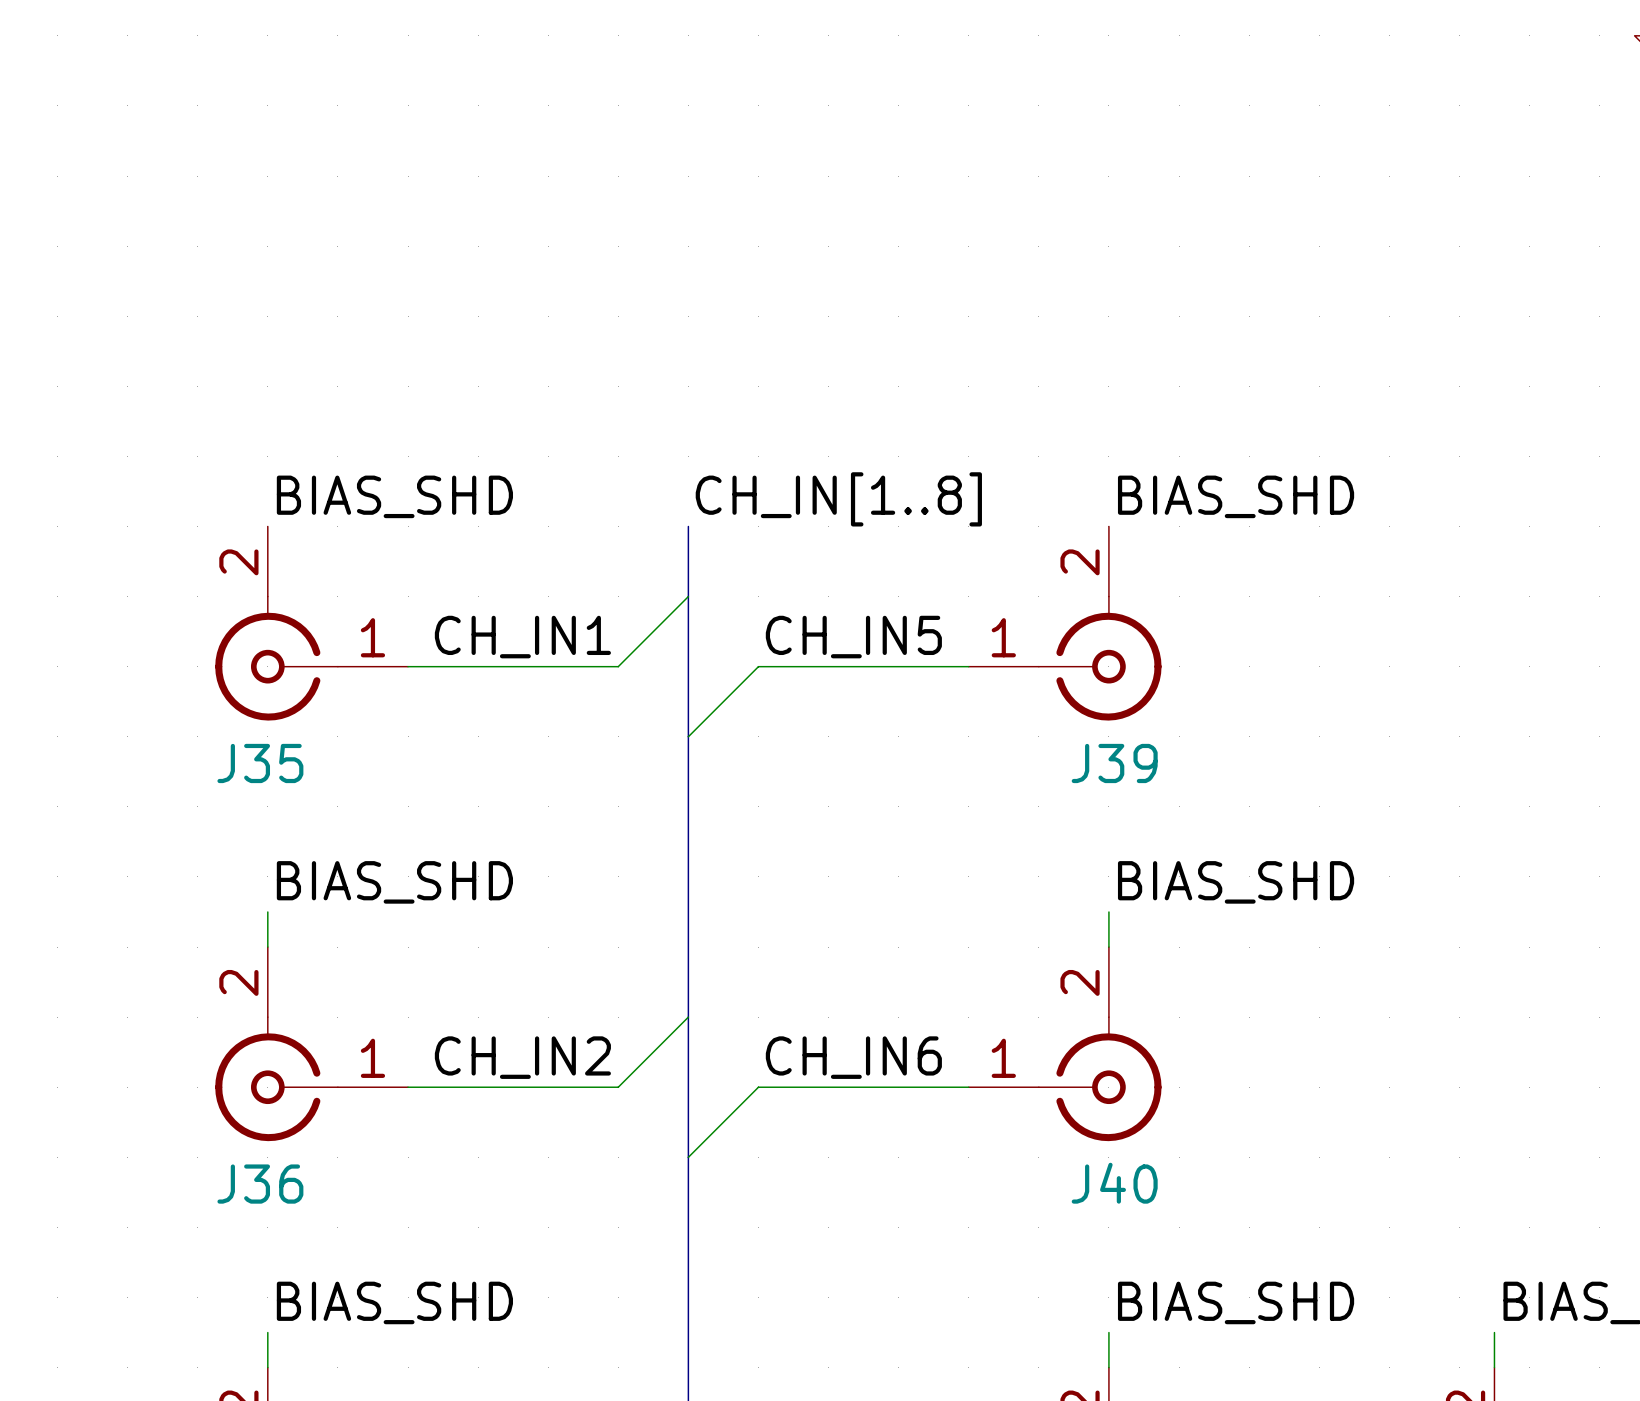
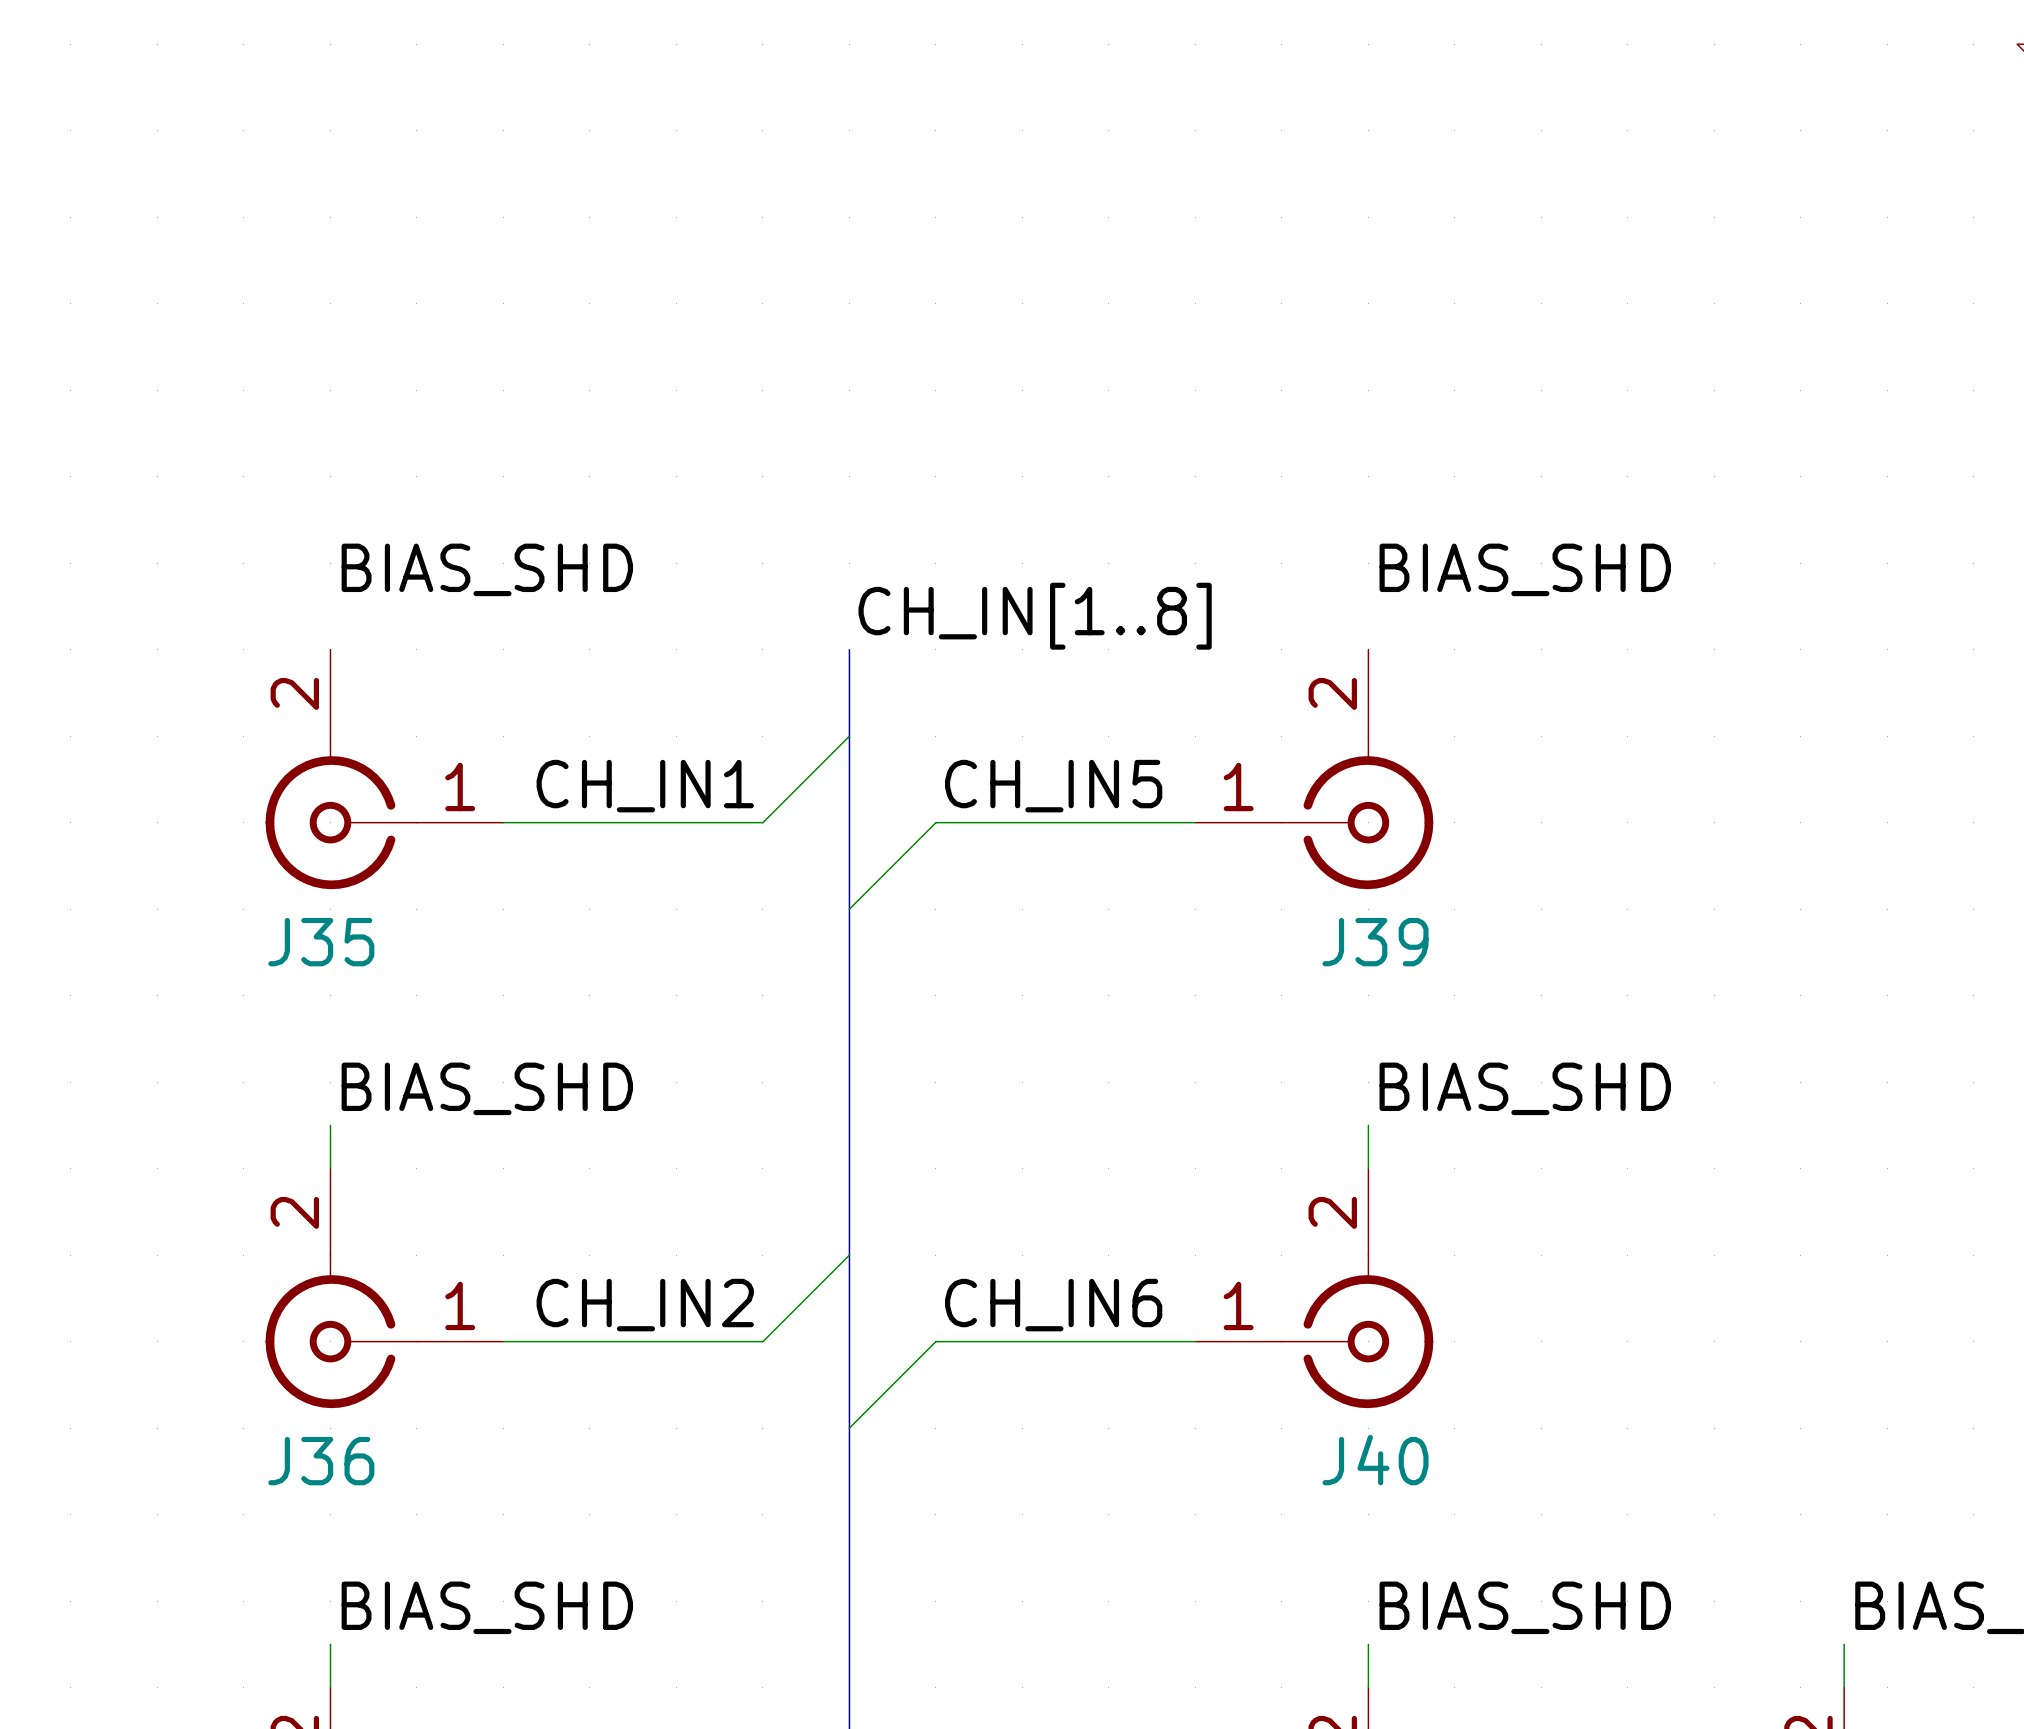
label position: BIAS_SHD (394, 496) -> BIAS_SHD (487, 569)
label position: BIAS_SHD (1236, 496) -> BIAS_SHD (1525, 569)

